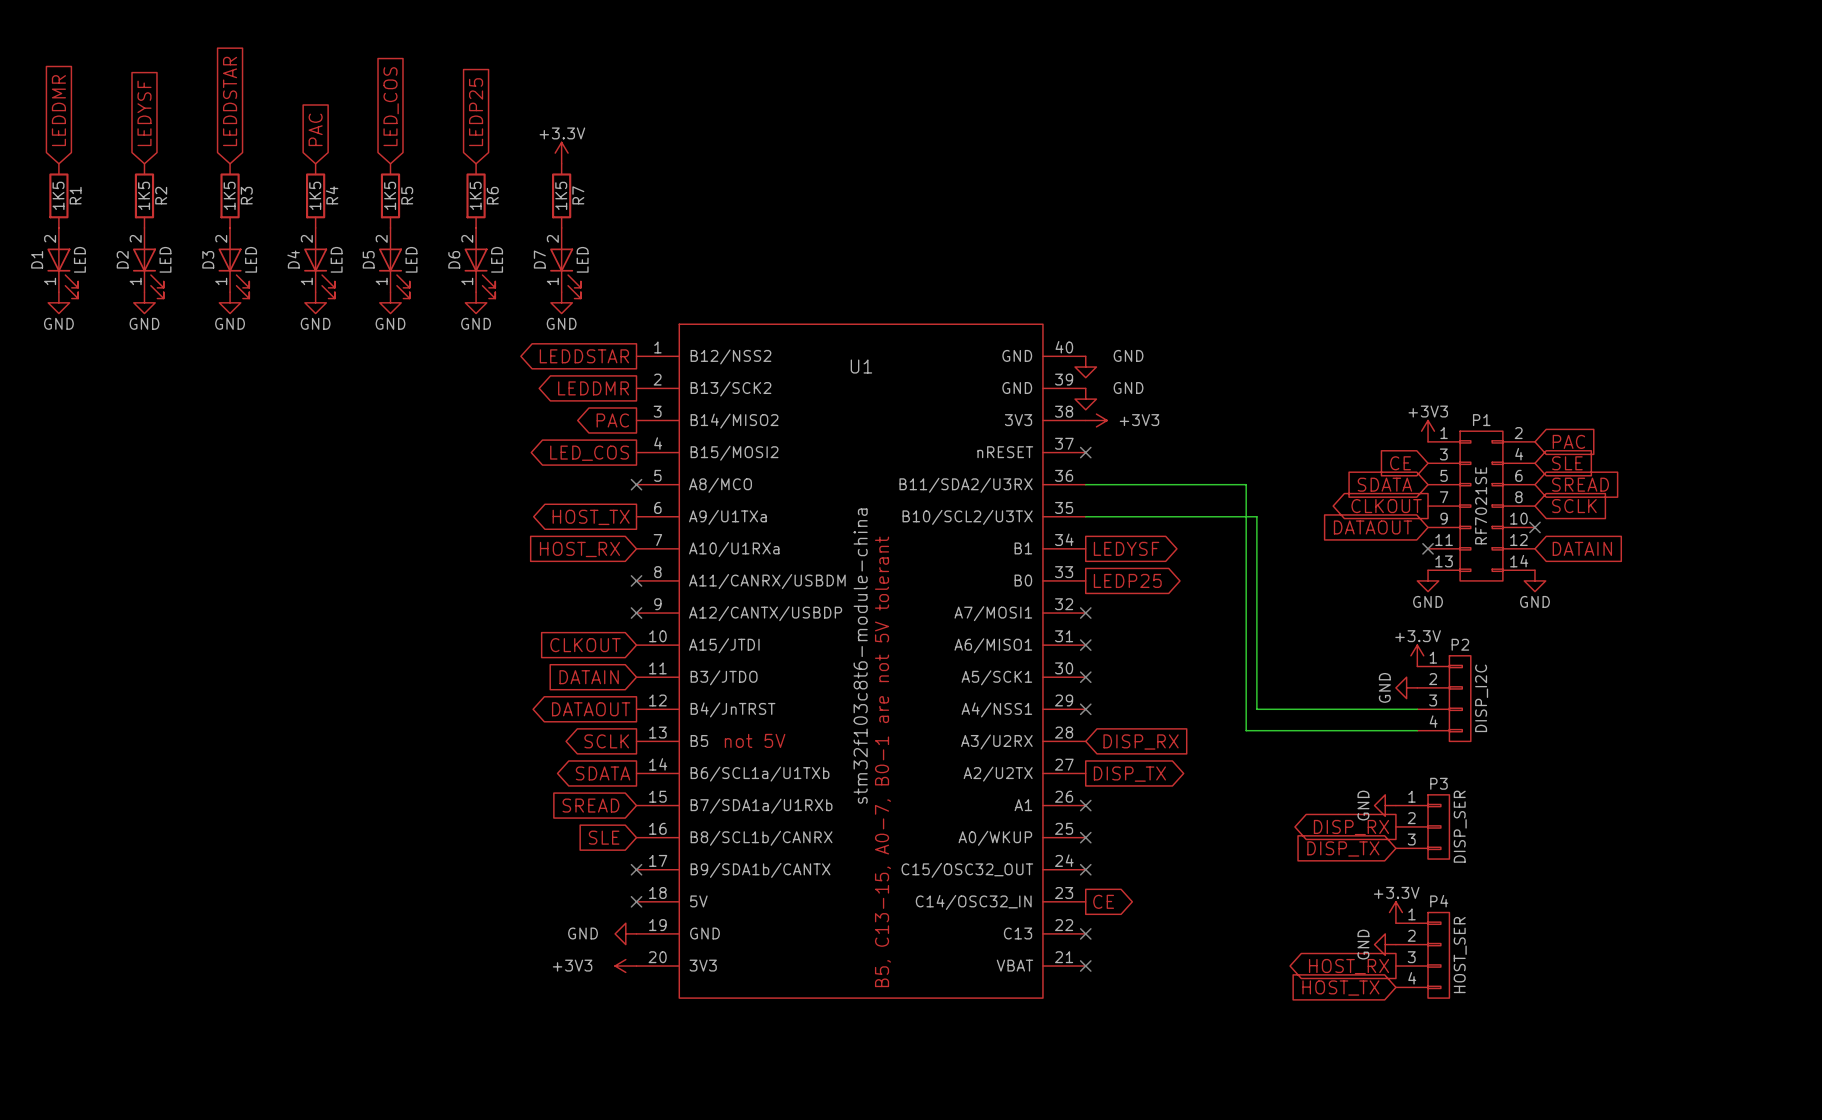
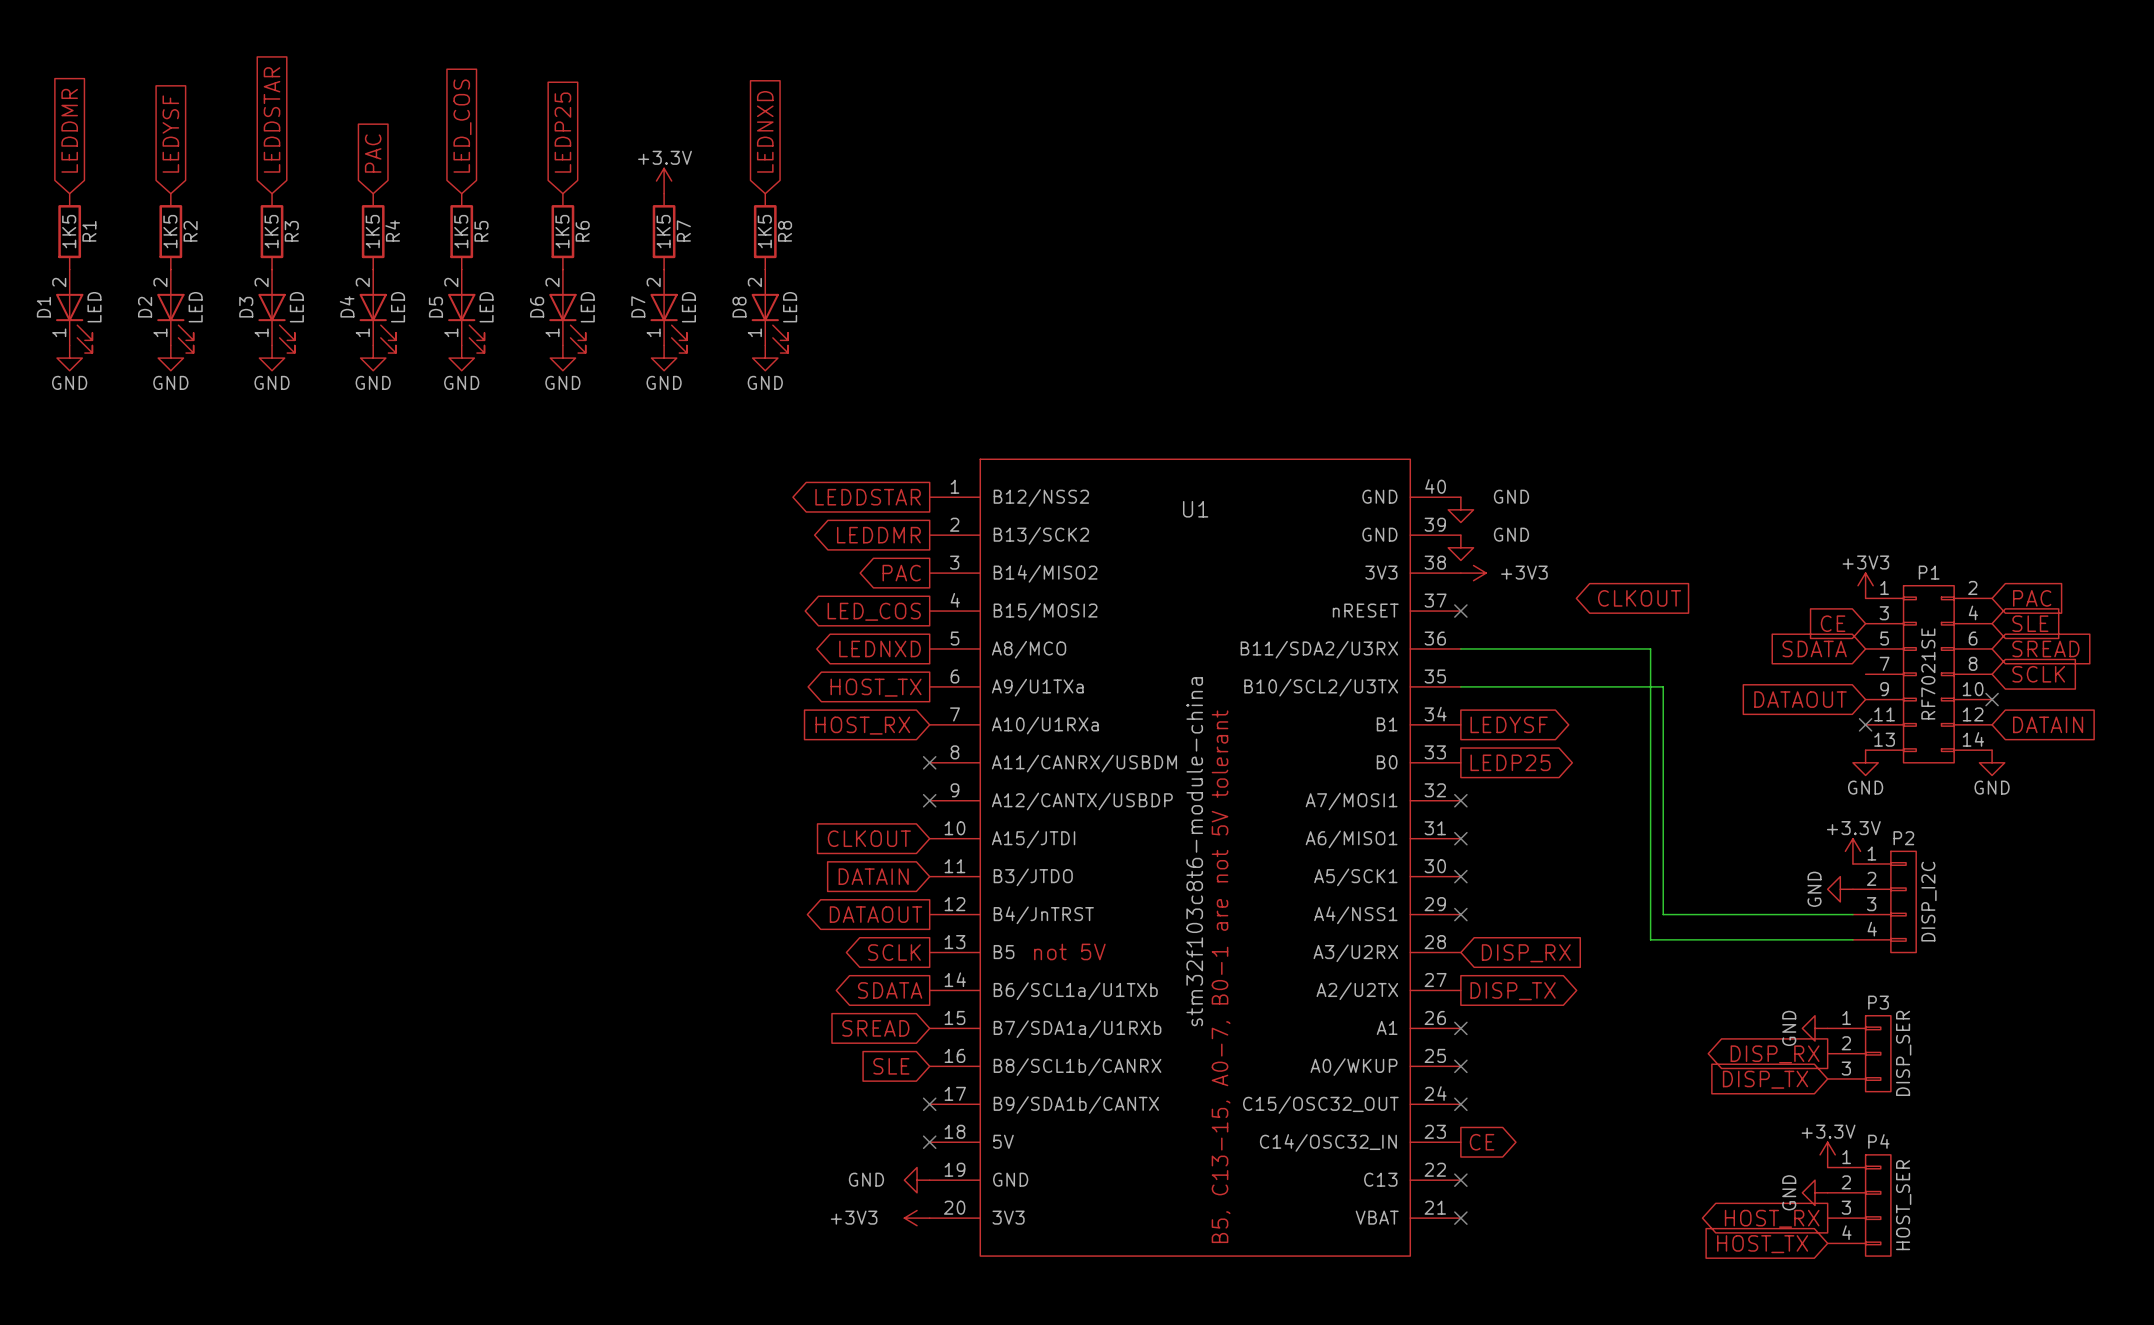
global label: none -> LEDNXD (765, 131)
R8: none -> 1K5 (765, 231)
D8: none -> LED (769, 311)
power symbol: none -> GND (765, 358)
global label position: LEDDSTAR (584, 356) -> LEDDSTAR (868, 497)
power symbol: GND (1085, 367) -> none
global label position: LEDDMR (593, 388) -> LEDDMR (878, 535)
power symbol: GND (1085, 399) -> none
global label position: PAC (612, 420) -> PAC (901, 573)
power symbol: +3V3 (1096, 420) -> none
power symbol: none -> GND (1460, 509)
power symbol: +3V3 (1428, 431) -> none
global label position: PAC (1568, 441) -> PAC (2032, 598)
no-connect mark: (1085, 452) -> none
global label position: LED_COS (589, 453) -> LED_COS (874, 611)
power symbol: none -> GND (1460, 547)
global label position: CE (1400, 463) -> CE (1833, 623)
global label position: SLE (1567, 463) -> SLE (2030, 623)
no-connect mark: (636, 484) -> none
wire: (1085, 484) (1246, 484) (1246, 730) (1417, 730) -> (1460, 648) (1650, 648) (1650, 939) (1852, 939)
power symbol: none -> +3V3 (1473, 573)
global label position: SDATA (1384, 484) -> SDATA (1814, 648)
global label position: SREAD (1580, 484) -> SREAD (2045, 648)
power symbol: none -> +3V3 (1865, 585)
P1 position: (1481, 506) -> (1928, 674)
global label position: SCLK (1574, 506) -> SCLK (2038, 674)
wire: (1085, 516) (1256, 516) (1256, 709) (1417, 709) -> (1460, 686) (1663, 686) (1663, 914) (1852, 914)
no-connect mark: none -> (1460, 611)
global label position: HOST_TX (591, 517) -> HOST_TX (876, 687)
global label position: DATAOUT (1373, 527) -> DATAOUT (1800, 699)
no-connect mark: (1534, 527) -> none
global label: none -> LEDNXD (880, 648)
global label position: LEDYSF (1126, 548) -> LEDYSF (1509, 724)
no-connect mark: (1428, 548) -> none
global label position: DATAIN (1582, 548) -> DATAIN (2048, 724)
global label position: HOST_RX (579, 549) -> HOST_RX (862, 725)
no-connect mark: (636, 580) -> none
global label position: LEDP25 (1127, 580) -> LEDP25 (1510, 762)
power symbol: GND (1428, 580) -> none
power symbol position: GND (1534, 580) -> GND (1865, 762)
no-connect mark: none -> (1992, 699)
no-connect mark: (636, 613) -> none
no-connect mark: (1085, 613) -> none
no-connect mark: none -> (1865, 724)
global label position: CLKOUT (585, 645) -> CLKOUT (869, 838)
no-connect mark: none -> (929, 762)
no-connect mark: (1085, 645) -> none
power symbol: none -> GND (1992, 762)
power symbol: +3.3V (1417, 655) -> none
U1 position: (861, 661) -> (1195, 857)
global label position: DATAIN (589, 677) -> DATAIN (873, 876)
no-connect mark: none -> (929, 800)
no-connect mark: (1085, 677) -> none
no-connect mark: none -> (1460, 800)
power symbol: GND (1406, 687) -> none
P2 position: (1444, 698) -> (1884, 901)
global label position: DATAOUT (591, 709) -> DATAOUT (876, 914)
no-connect mark: (1085, 709) -> none
no-connect mark: none -> (1460, 838)
power symbol: none -> +3.3V (1852, 851)
global label position: SCLK (606, 741) -> SCLK (894, 952)
global label: DISP_RX (1141, 741) -> none
no-connect mark: none -> (1460, 876)
power symbol: none -> GND (1840, 889)
global label position: SDATA (603, 773) -> SDATA (890, 990)
no-connect mark: none -> (1460, 914)
global label: DISP_TX (1129, 774) -> none
global label position: SREAD (590, 805) -> SREAD (875, 1028)
no-connect mark: (1085, 805) -> none
power symbol: GND (1385, 805) -> none
global label: none -> DISP_RX (1526, 953)
P3 position: (1422, 826) -> (1859, 1053)
global label: DISP_RX (1351, 827) -> none
global label position: SLE (604, 837) -> SLE (891, 1066)
no-connect mark: (1085, 837) -> none
global label: none -> DISP_TX (1513, 991)
global label: DISP_TX (1343, 848) -> none
no-connect mark: (636, 869) -> none
no-connect mark: (1085, 869) -> none
no-connect mark: none -> (1460, 1028)
power symbol: none -> GND (1815, 1028)
global label: none -> DISP_RX (1775, 1054)
no-connect mark: (636, 901) -> none
global label position: CE (1103, 901) -> CE (1482, 1142)
no-connect mark: none -> (1460, 1066)
power symbol: +3.3V (1395, 912) -> none
global label: none -> DISP_TX (1765, 1079)
power symbol position: GND (625, 933) -> GND (917, 1180)
no-connect mark: none -> (929, 1104)
no-connect mark: (1085, 933) -> none
no-connect mark: none -> (1460, 1104)
power symbol: GND (1385, 944) -> none
P4 position: (1422, 955) -> (1859, 1205)
power symbol position: +3V3 (625, 966) -> +3V3 (917, 1218)
no-connect mark: none -> (929, 1142)
no-connect mark: (1085, 966) -> none
global label position: HOST_RX (1349, 966) -> HOST_RX (1772, 1218)
power symbol: none -> +3.3V (1827, 1154)
global label position: HOST_TX (1340, 988) -> HOST_TX (1762, 1244)
no-connect mark: none -> (1460, 1180)
power symbol: none -> GND (1815, 1192)
no-connect mark: none -> (1460, 1218)

